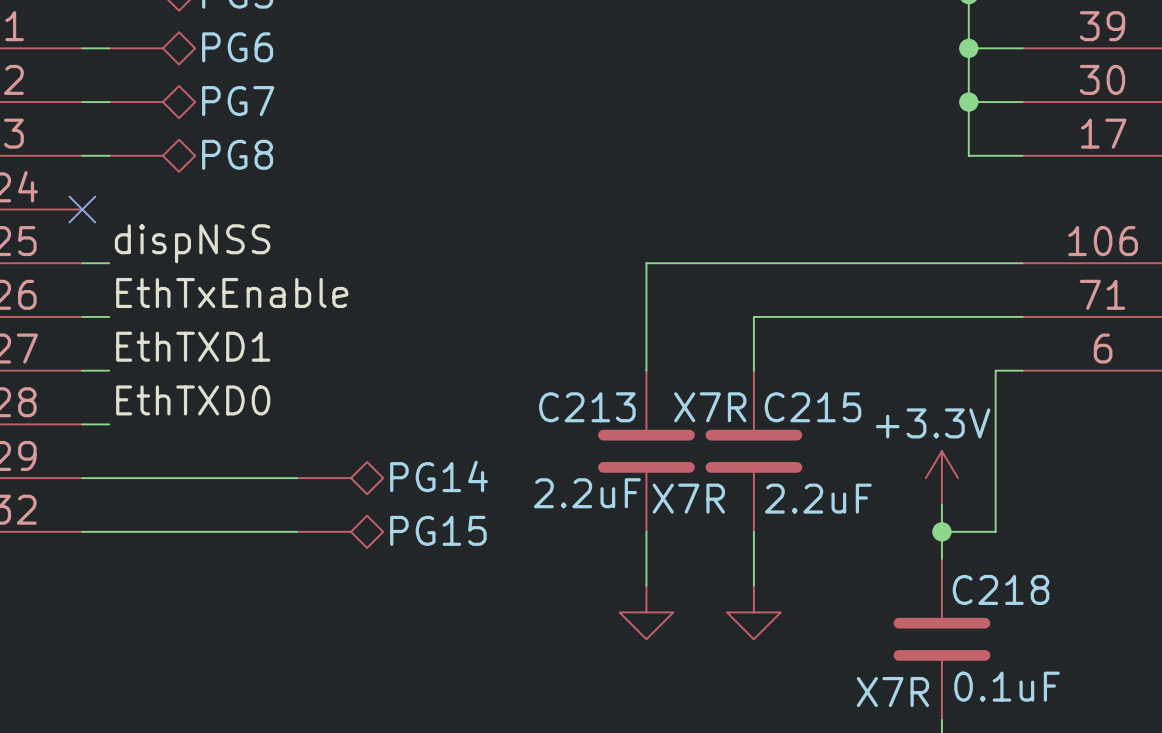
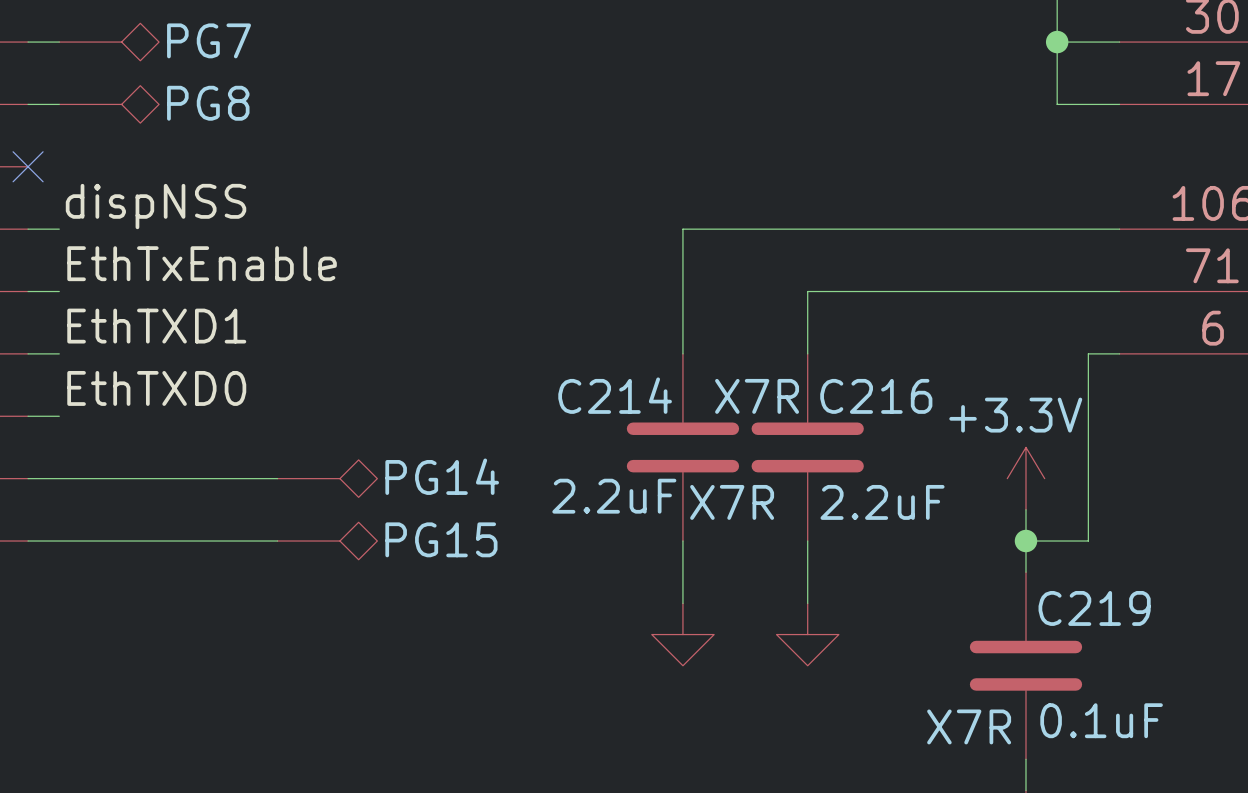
C213 name: C213 (587, 407) -> C214 (615, 395)
C215 name: C215 (813, 407) -> C216 (876, 396)
C218 name: C218 (1001, 589) -> C219 (1094, 608)

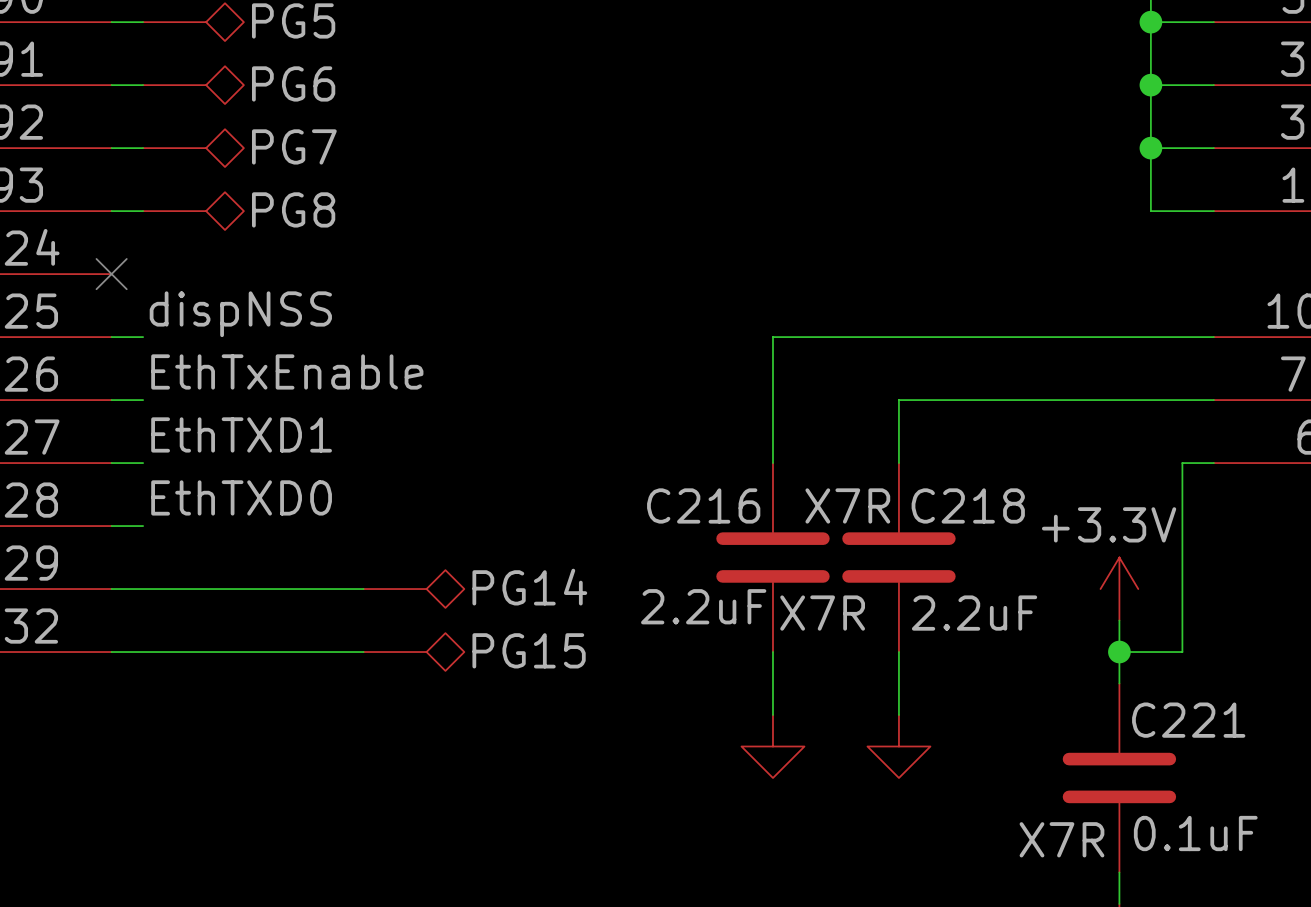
C214 name: C214 (615, 395) -> C216 (703, 505)
C216 name: C216 (876, 396) -> C218 (968, 505)
C219 name: C219 (1094, 608) -> C221 (1188, 720)

